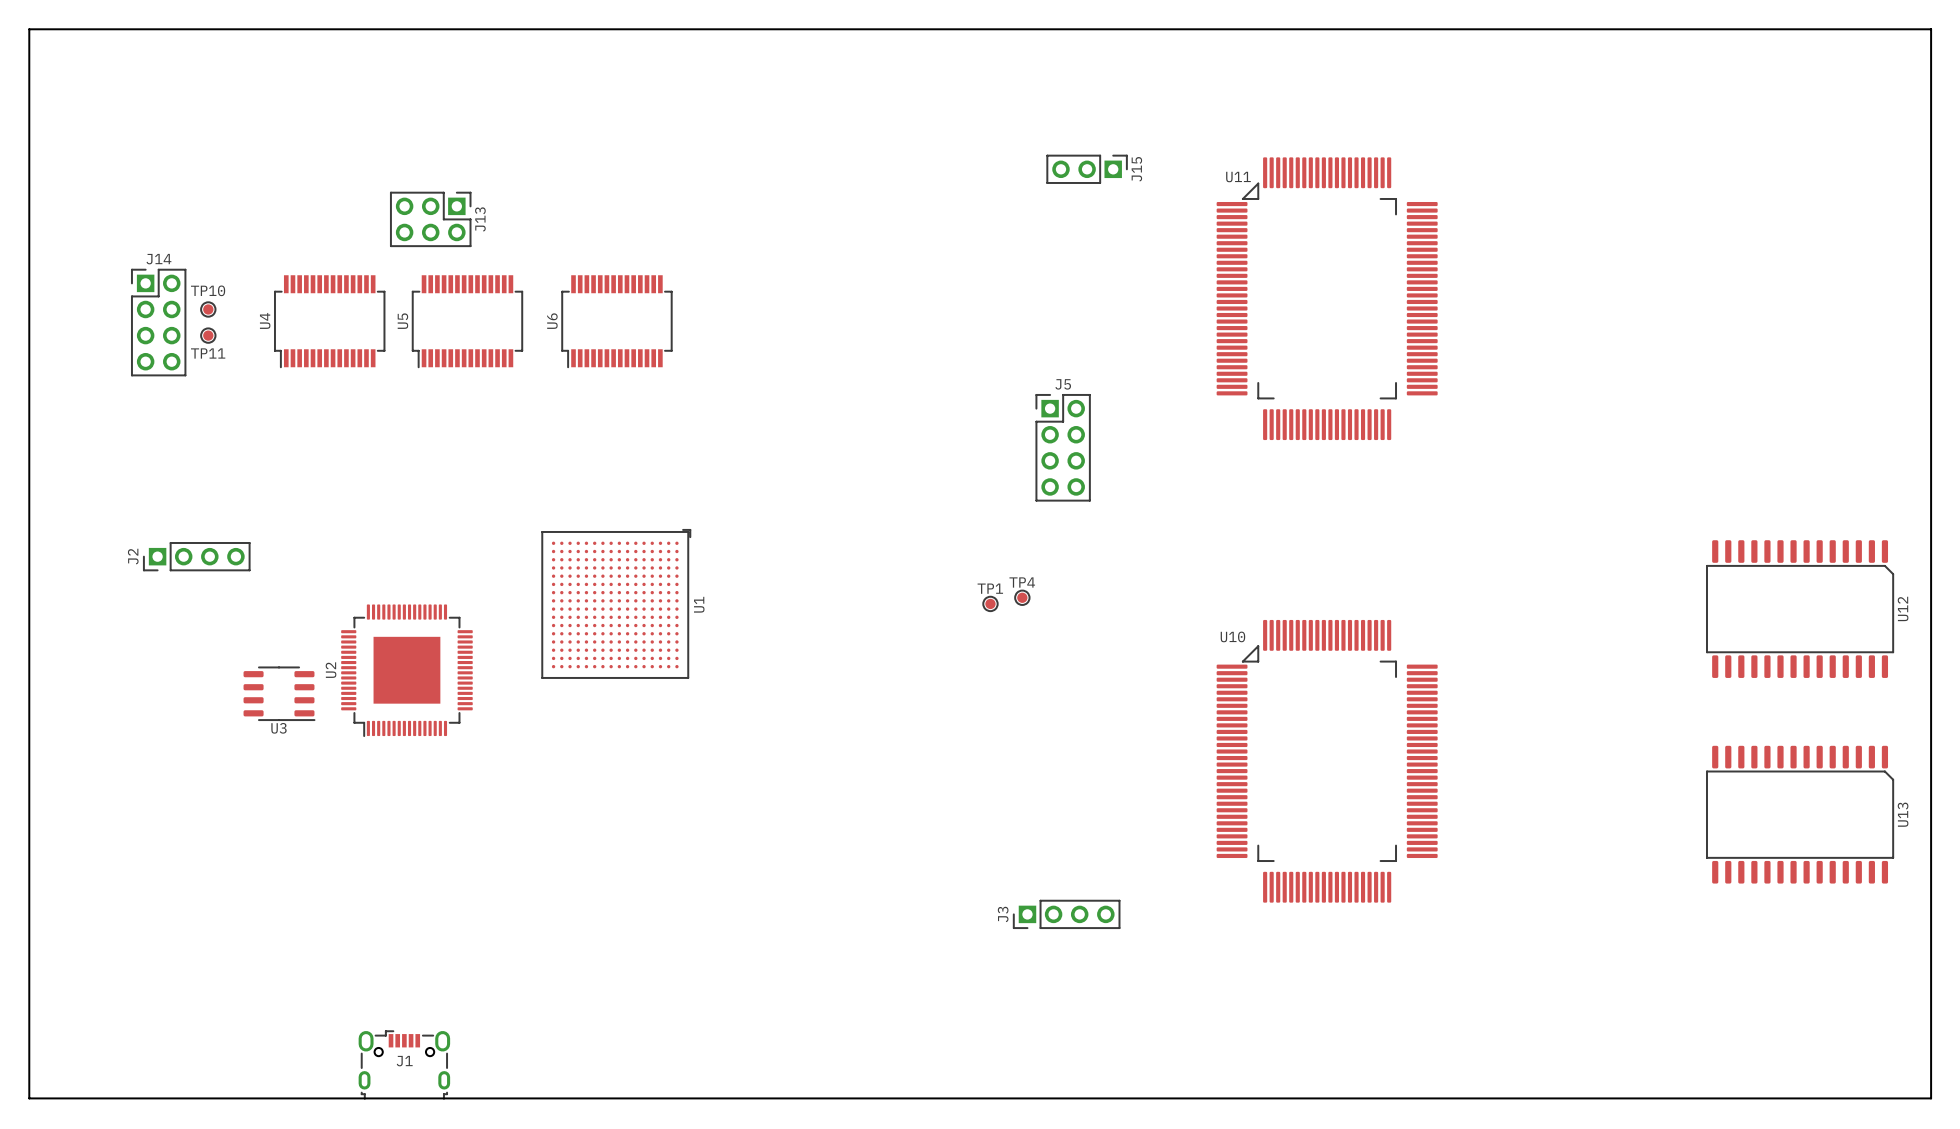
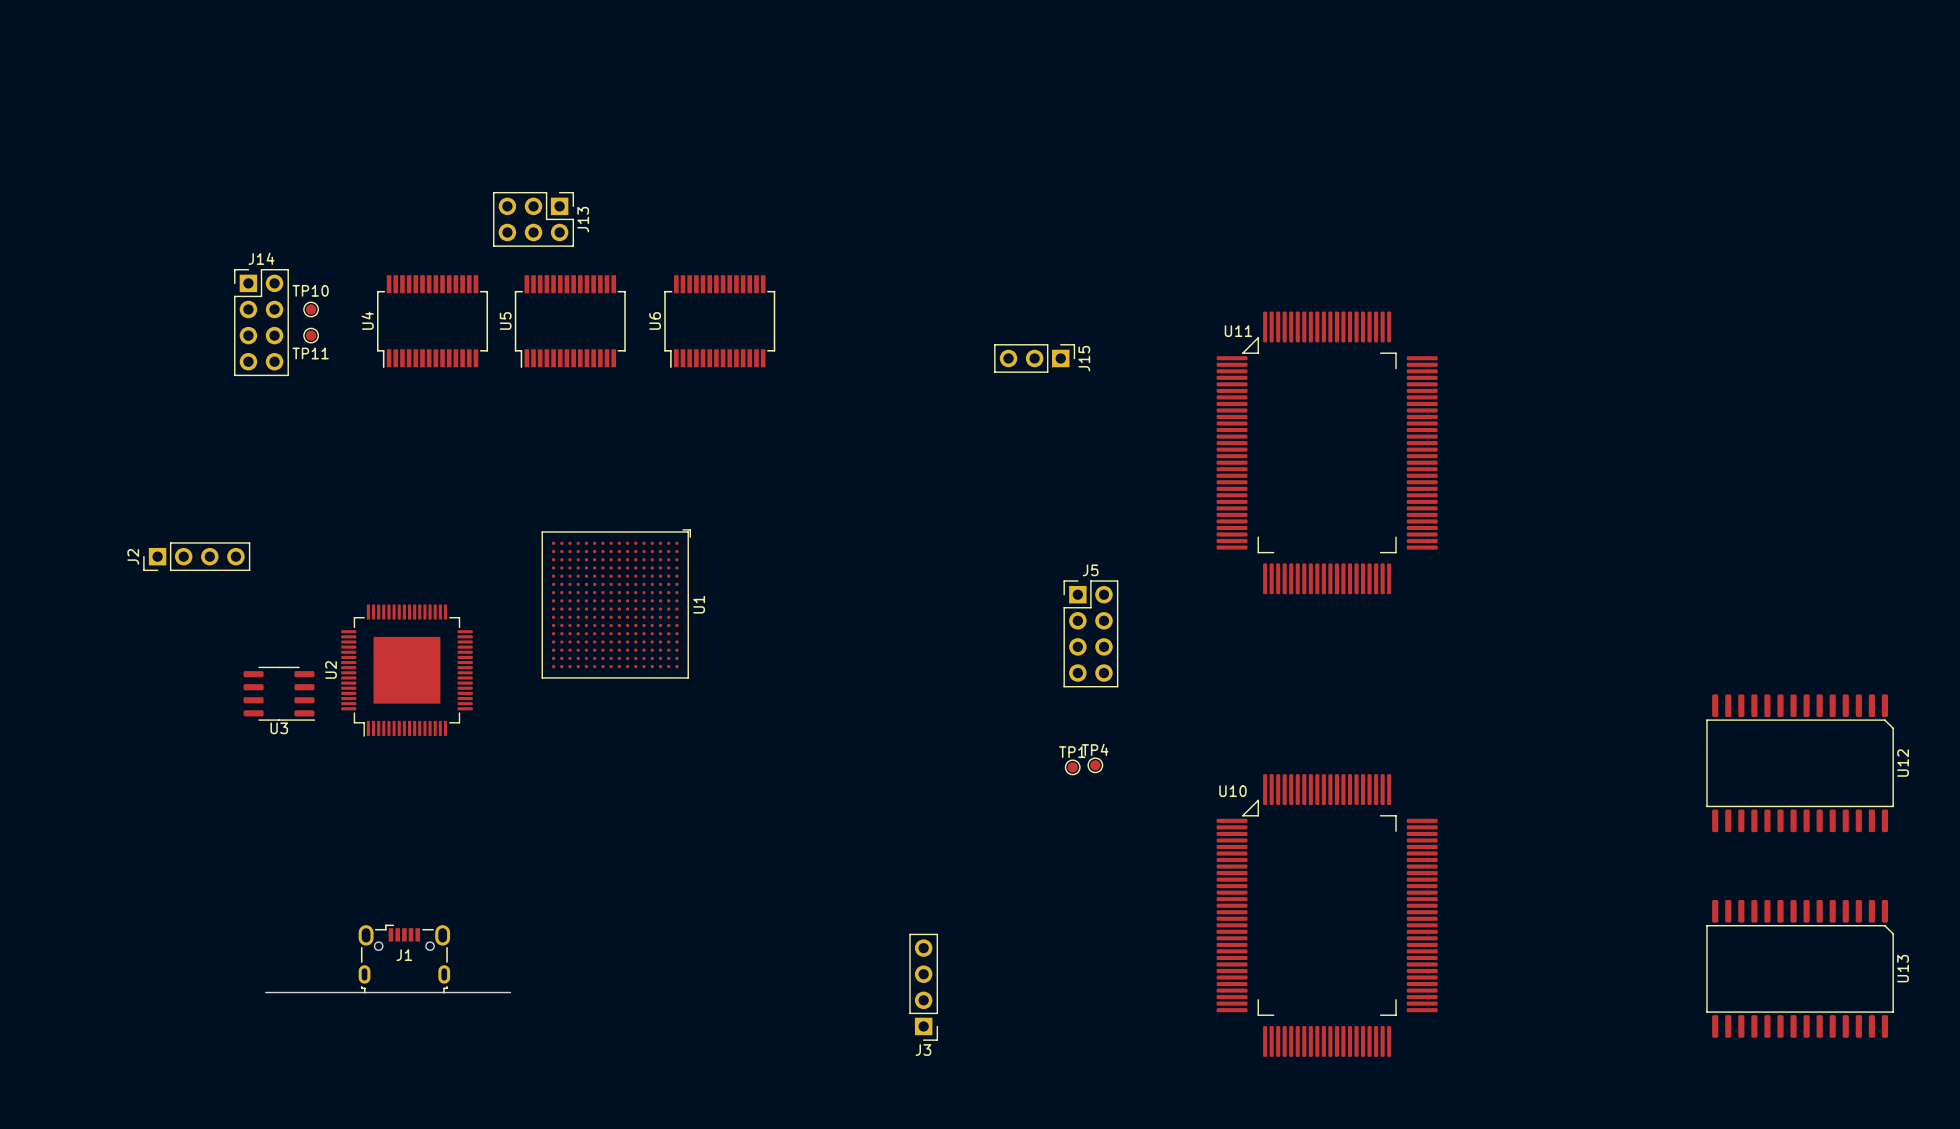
board edge: (29, 29) (29, 1098) (1931, 1098) (1931, 29) (29, 29) -> none
J15 position: (1087, 169) -> (1034, 358)
J13 position: (430, 219) -> (533, 219)
U11 position: (1327, 298) -> (1327, 452)
TP10 position: (208, 309) -> (311, 309)
U4 position: (329, 321) -> (432, 321)
U5 position: (467, 321) -> (570, 321)
U6 position: (616, 321) -> (719, 321)
J14 position: (158, 322) -> (261, 322)
TP11 position: (208, 335) -> (311, 335)
J5 position: (1063, 447) -> (1090, 633)
TP4 position: (1022, 597) -> (1095, 765)
TP1 position: (990, 603) -> (1072, 767)
U12 position: (1800, 609) -> (1800, 763)
U10 position: (1327, 761) -> (1327, 915)
U13 position: (1800, 814) -> (1800, 968)
J3 rotation: 0° (1066, 914) -> 90° counterclockwise (923, 987)
J3 position: (1066, 914) -> (923, 987)
board edge: none -> (265, 992) (510, 992)
J1 position: (404, 1065) -> (404, 959)

